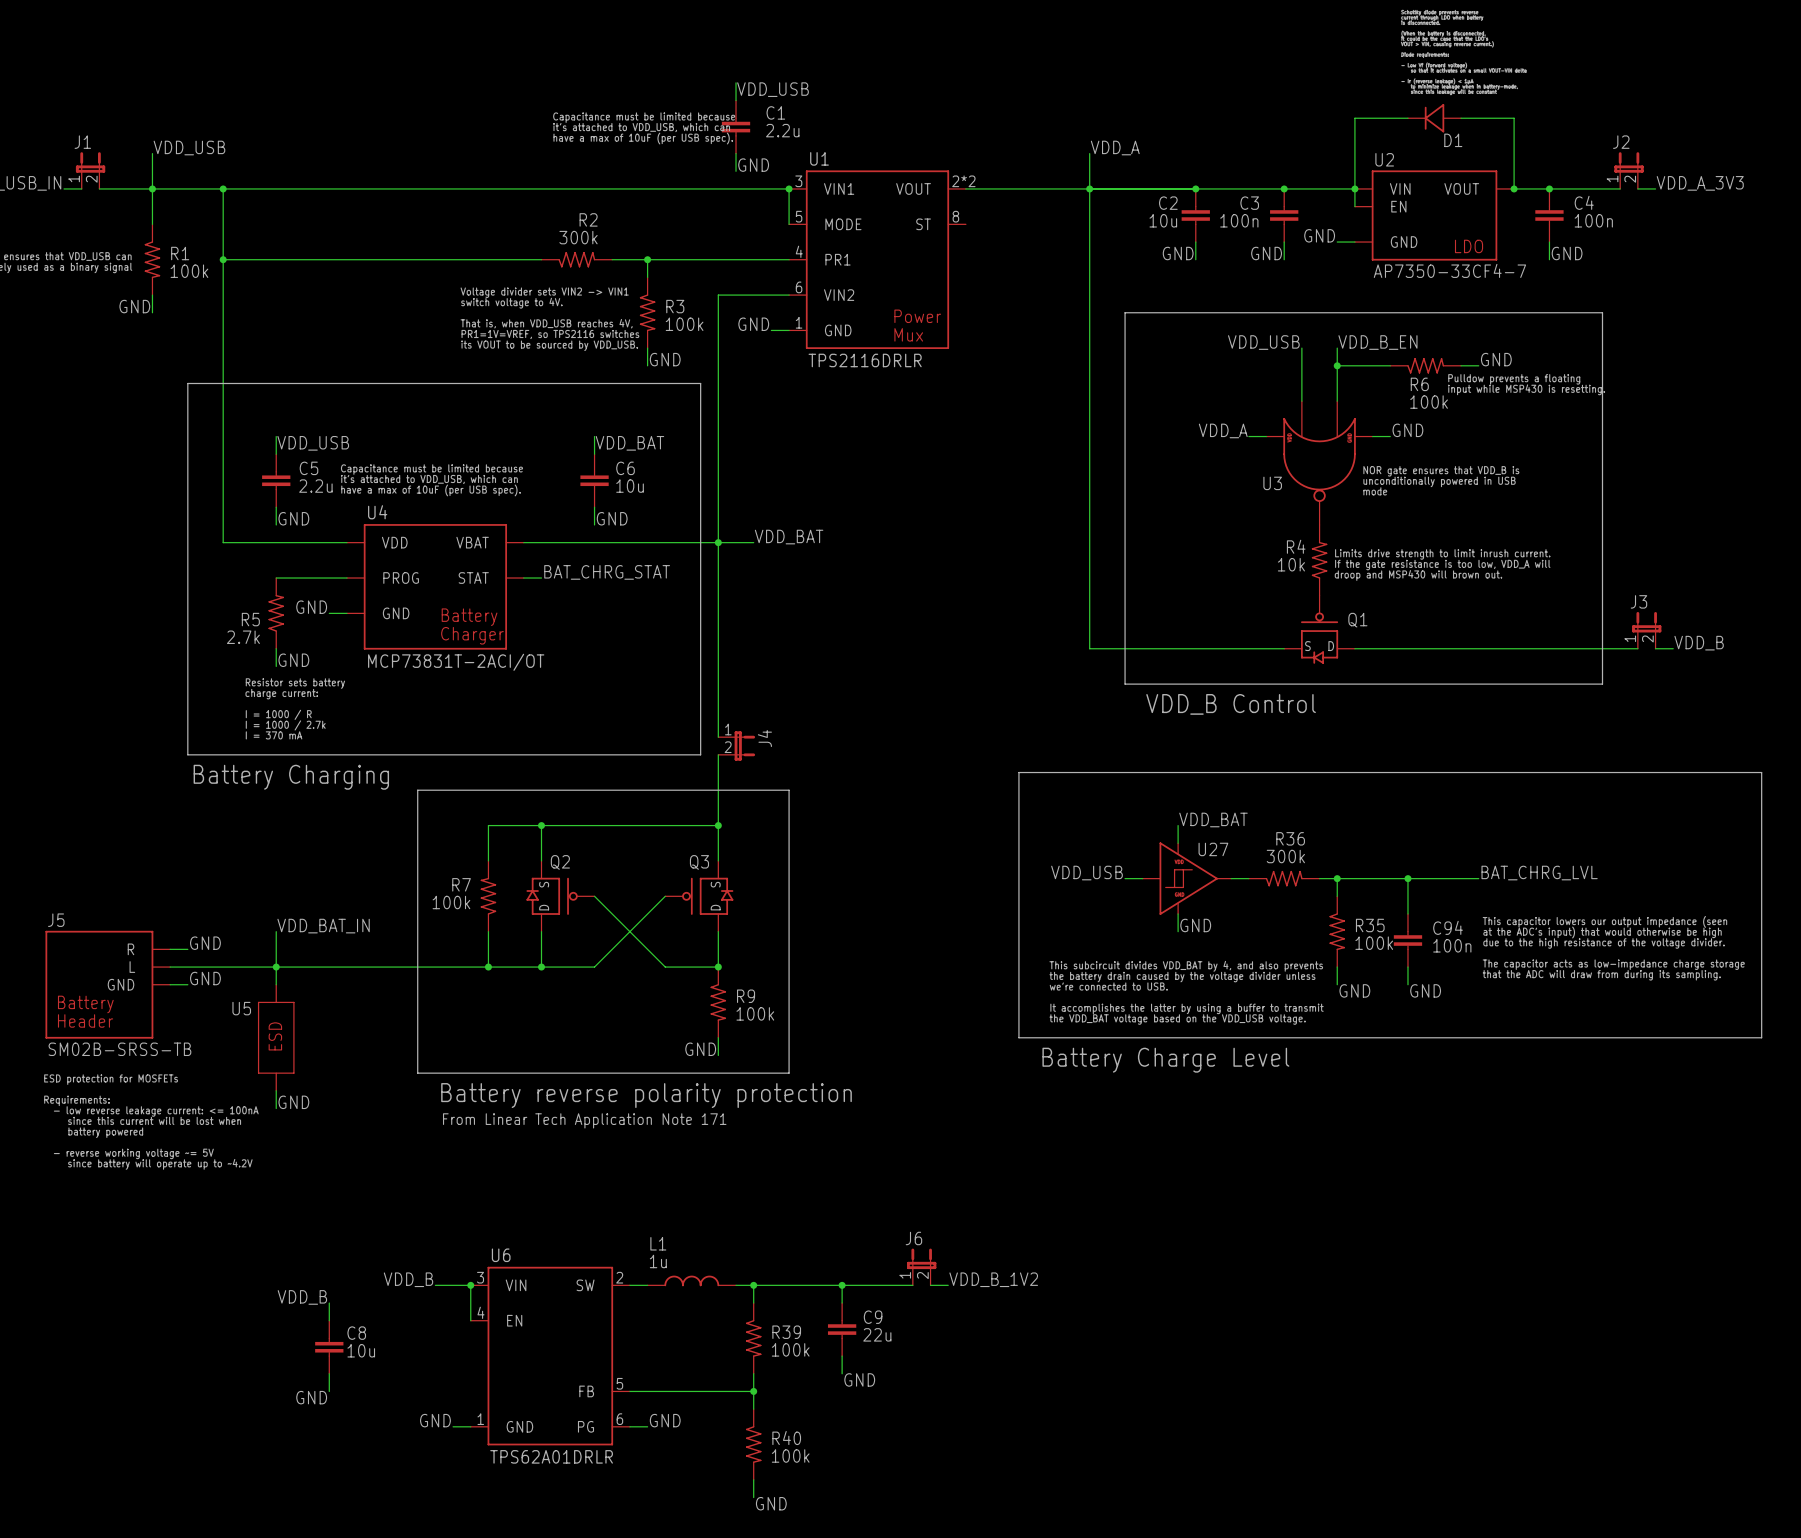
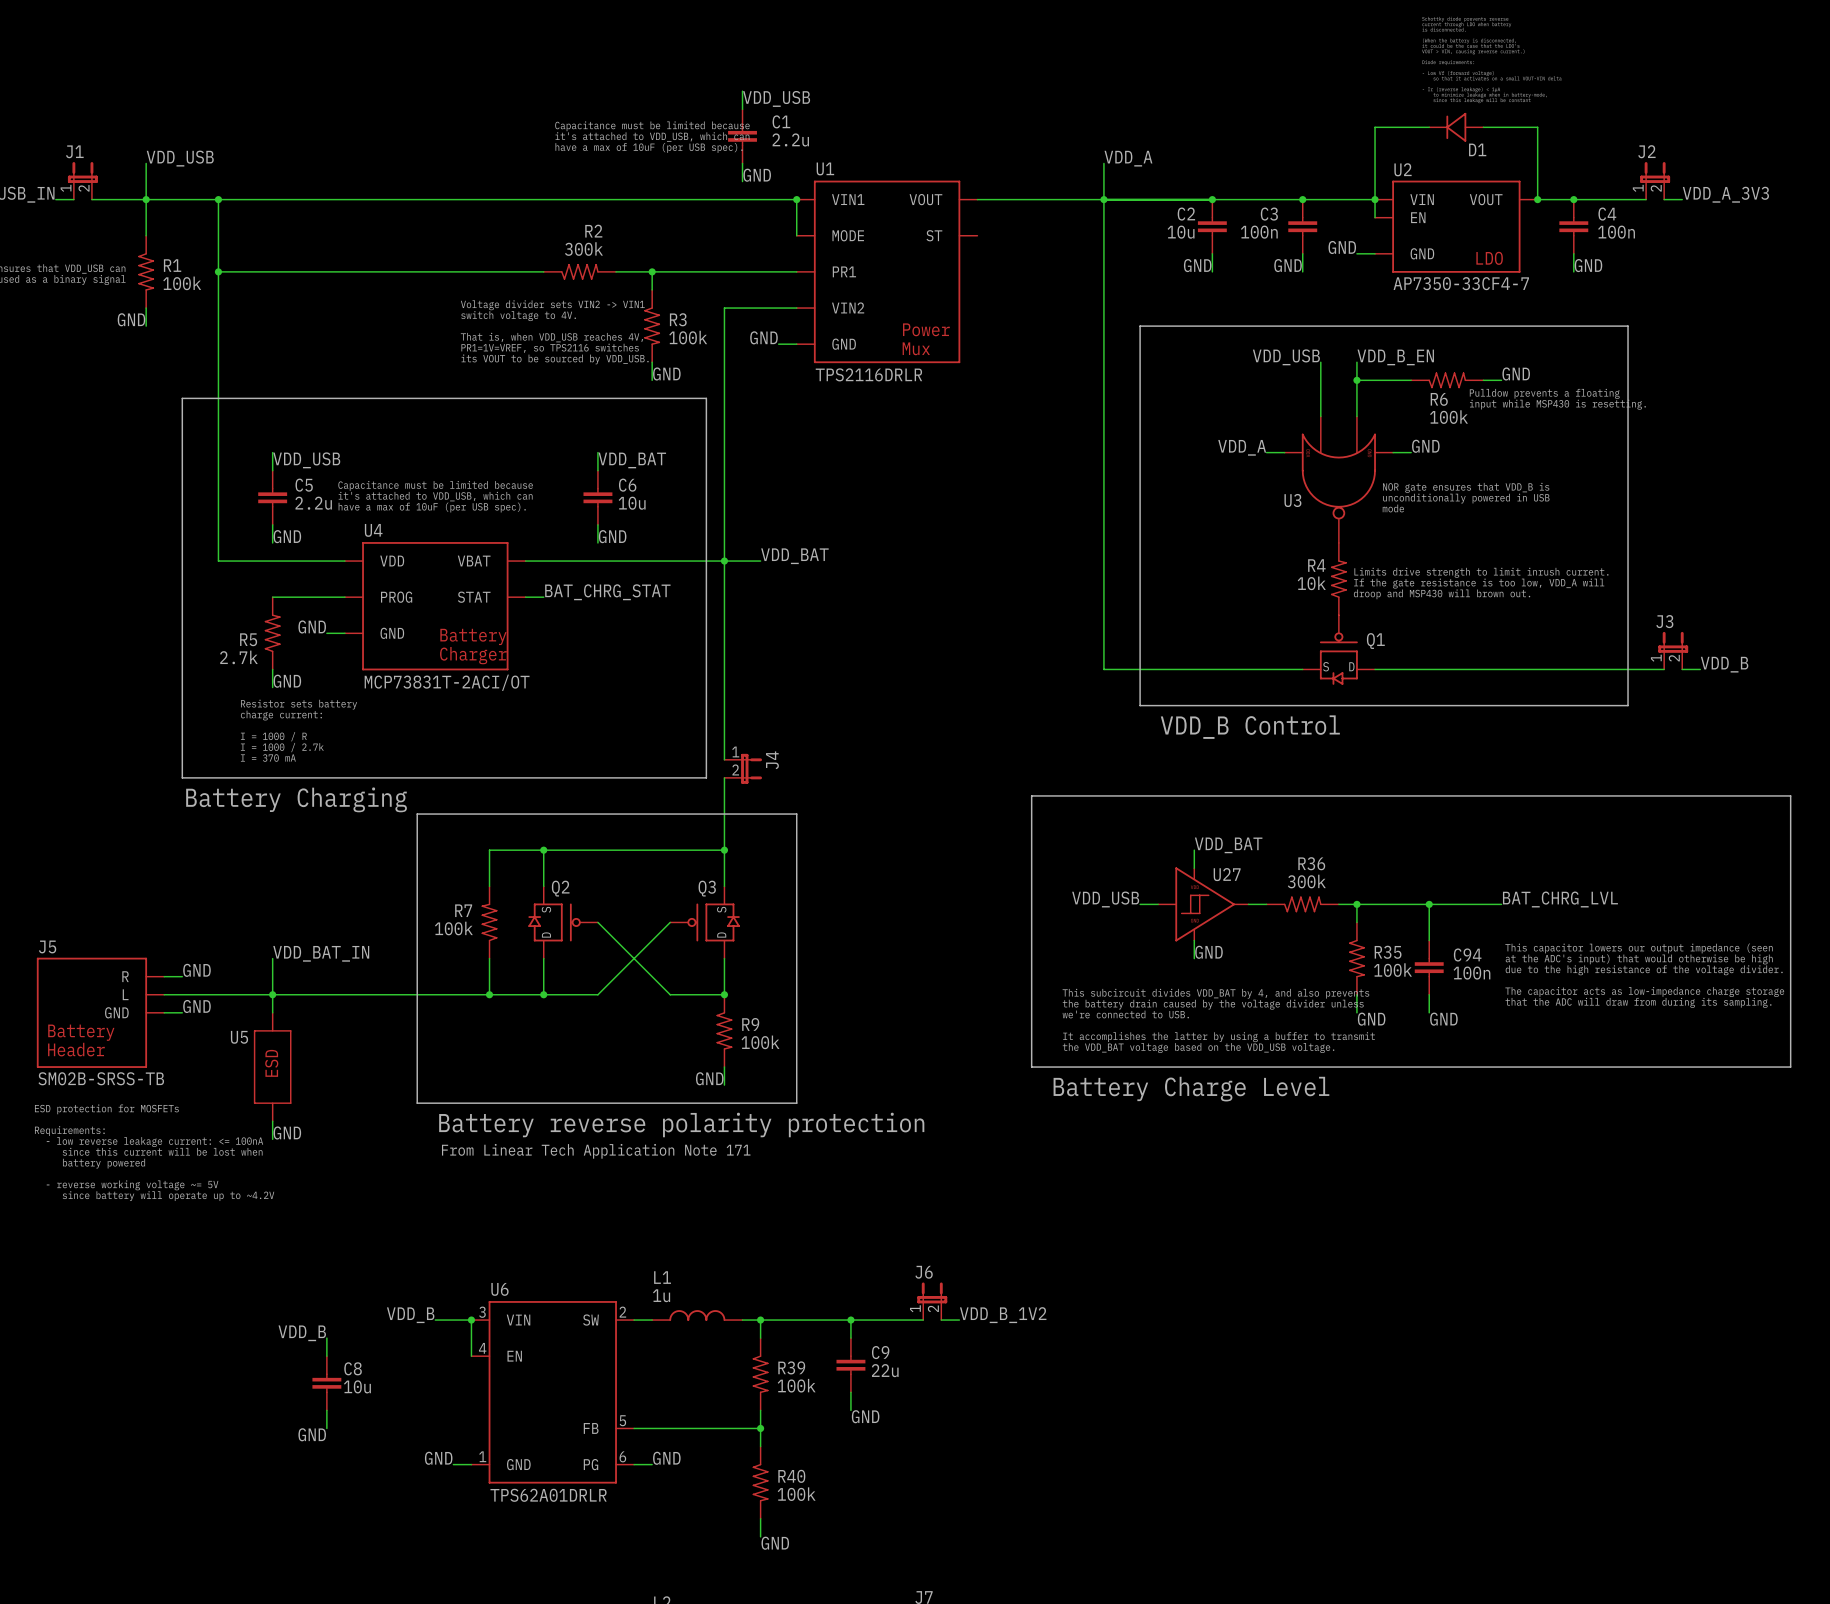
U1 pin number: 3 (798, 181) -> none
U1 pin number: 2*2 (963, 181) -> none
U1 pin number: 5 (799, 216) -> none
U1 pin number: 8 (955, 216) -> none
U1 pin number: 4 (799, 251) -> none
U1 pin number: 6 (799, 287) -> none
U1 pin number: 1 (799, 322) -> none

